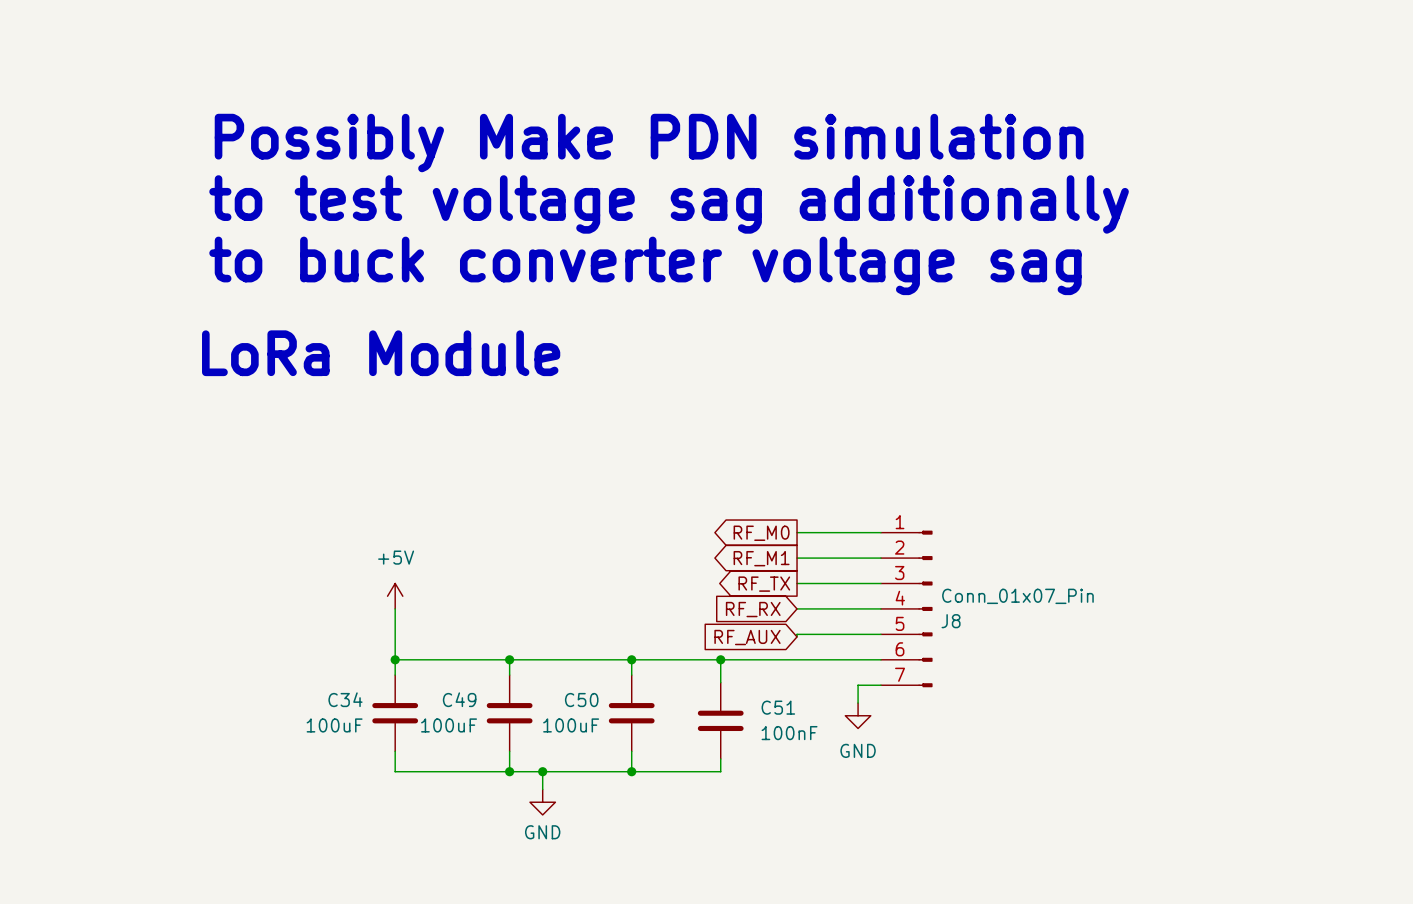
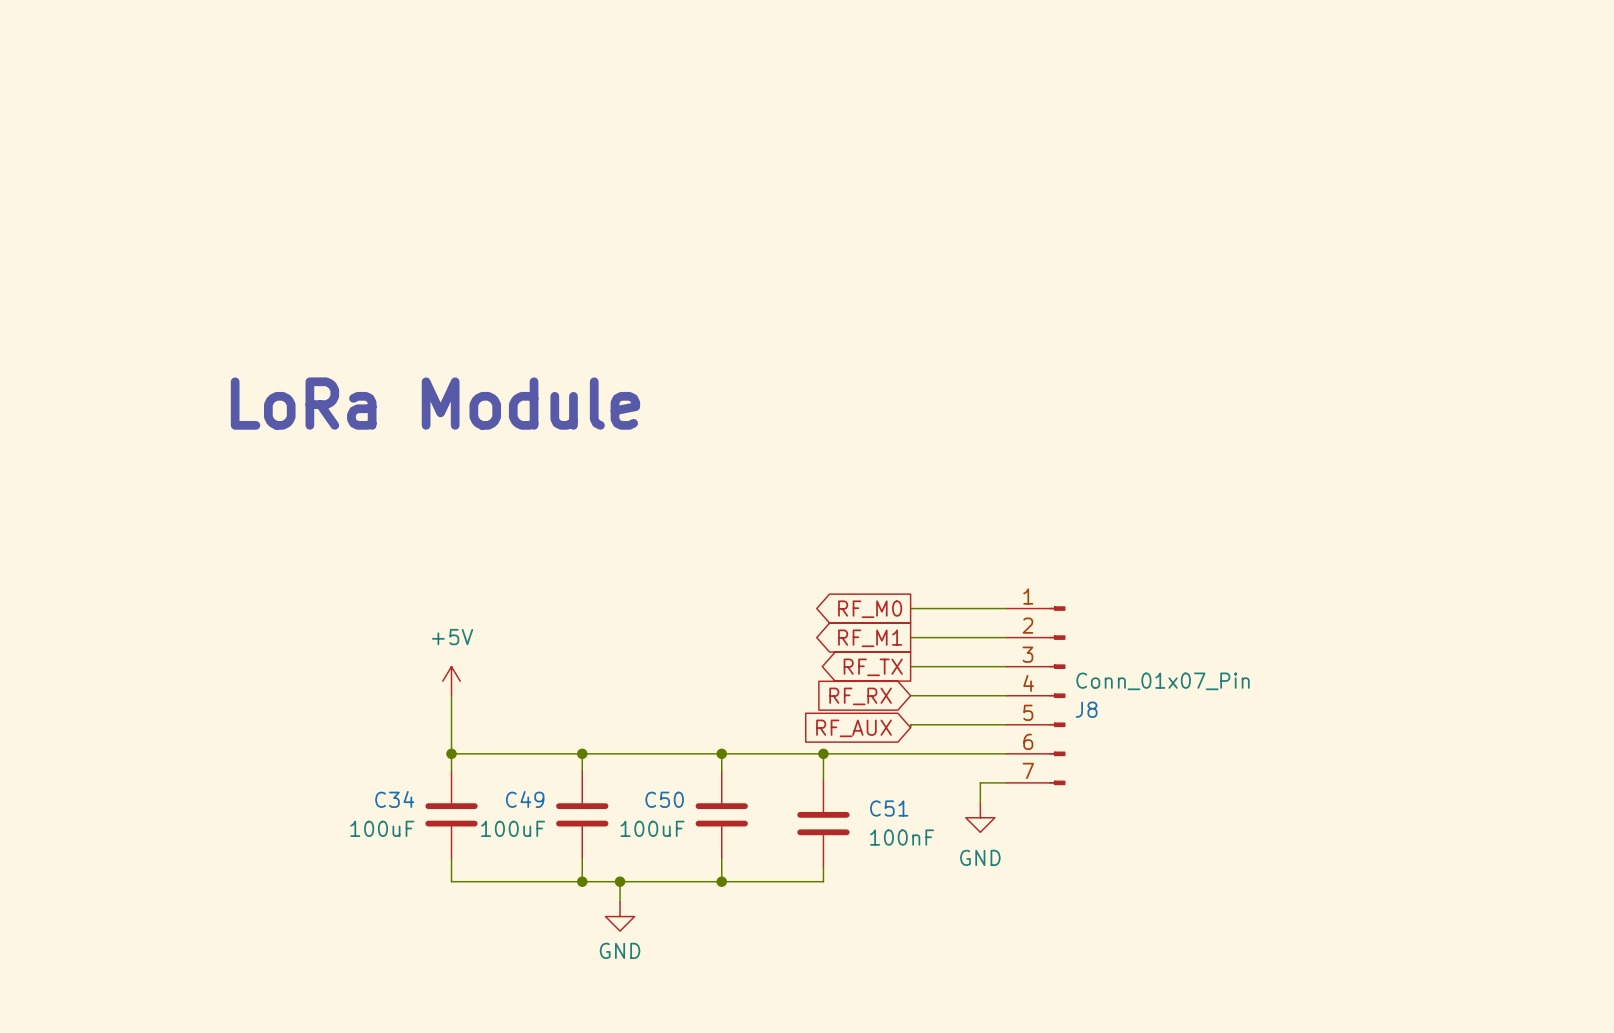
text: Possibly Make PDN simulation (649, 143) -> none
text: to test voltage sag additionally (669, 204) -> none
text: to buck converter voltage sag (645, 265) -> none

